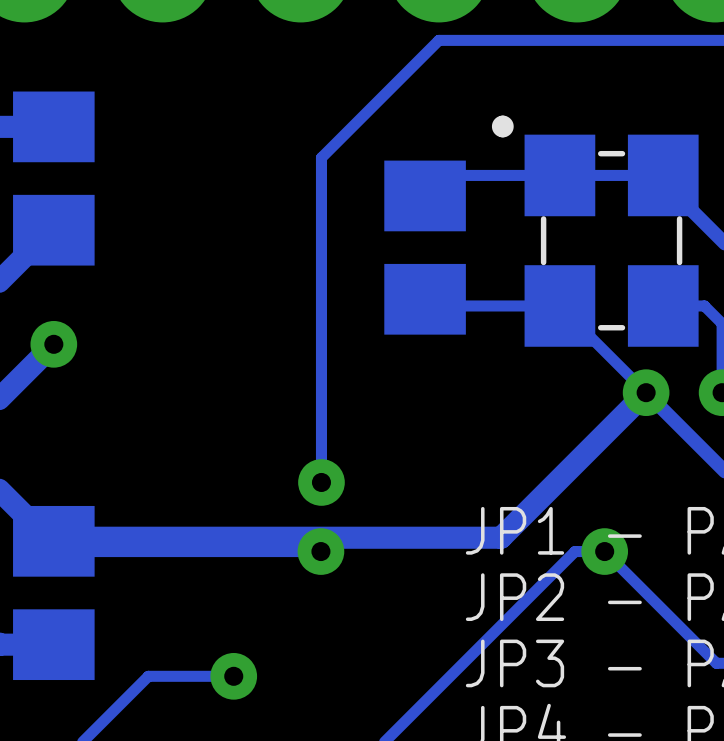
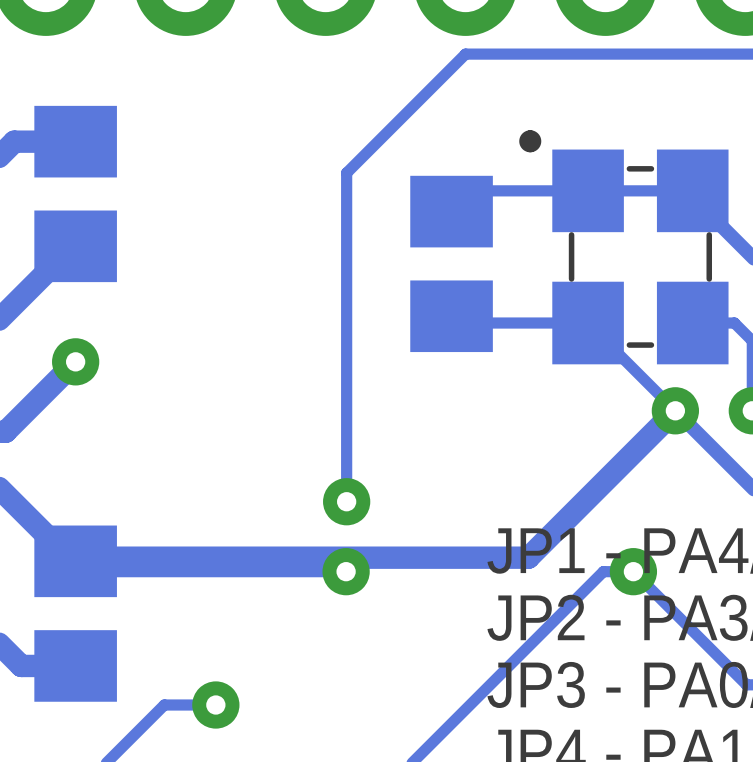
track: (233, 676) (148, 676) (141, 683) -> (215, 705) (164, 705)
via position: (233, 676) -> (215, 705)

